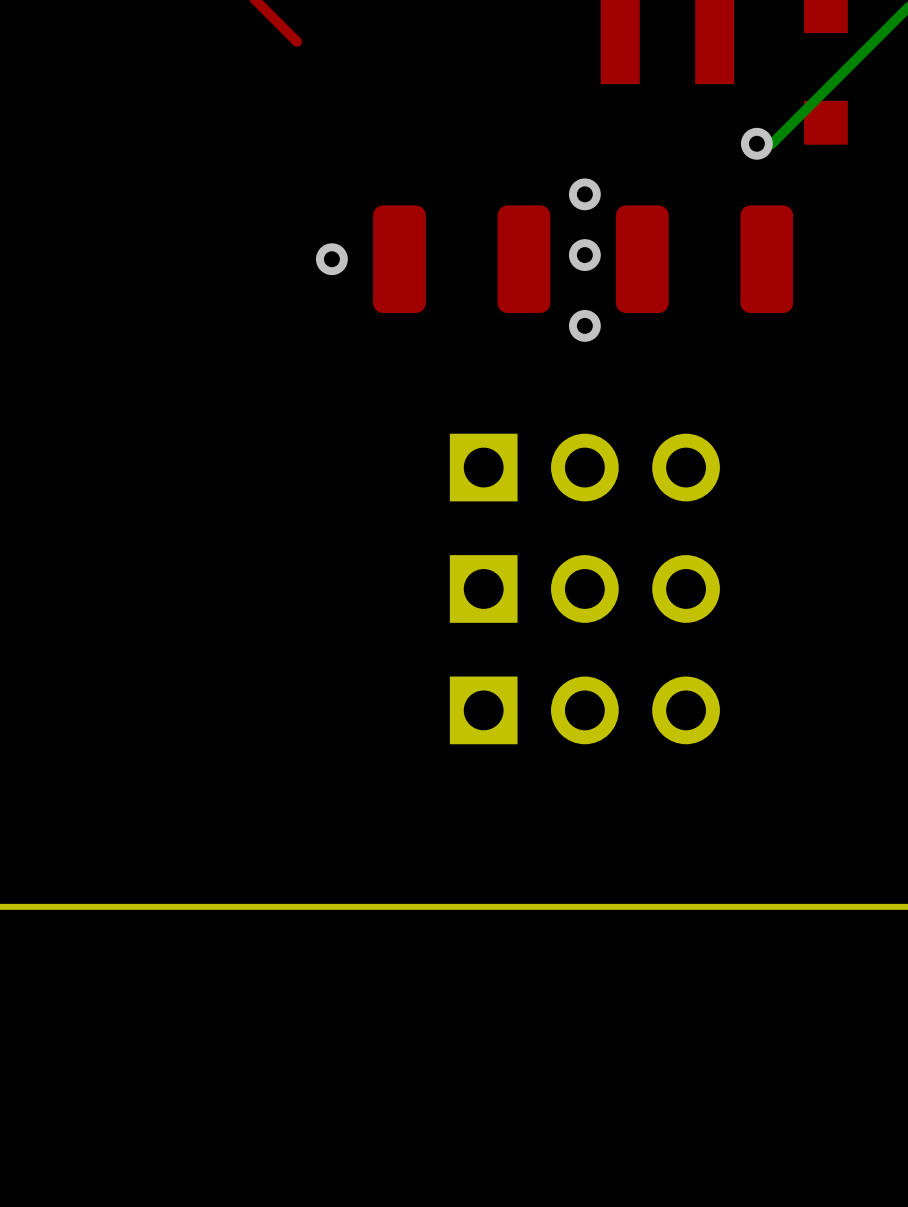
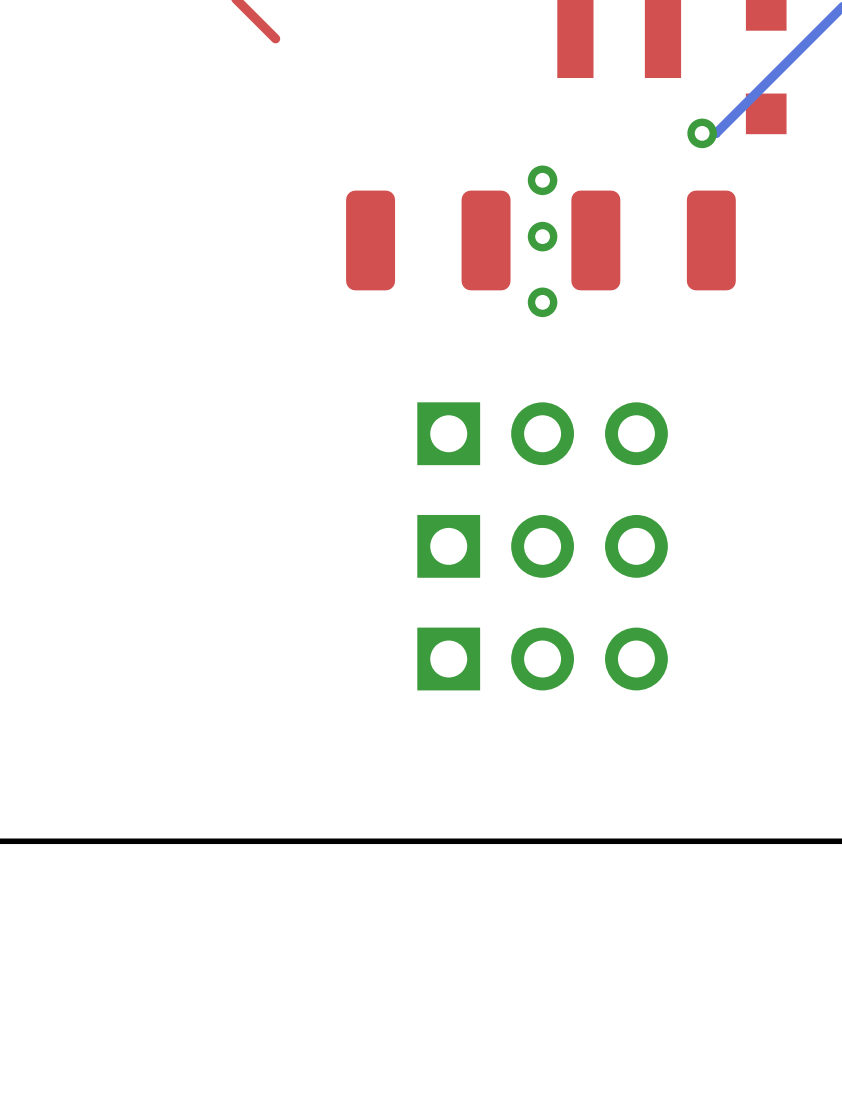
via: (331, 259) -> none

